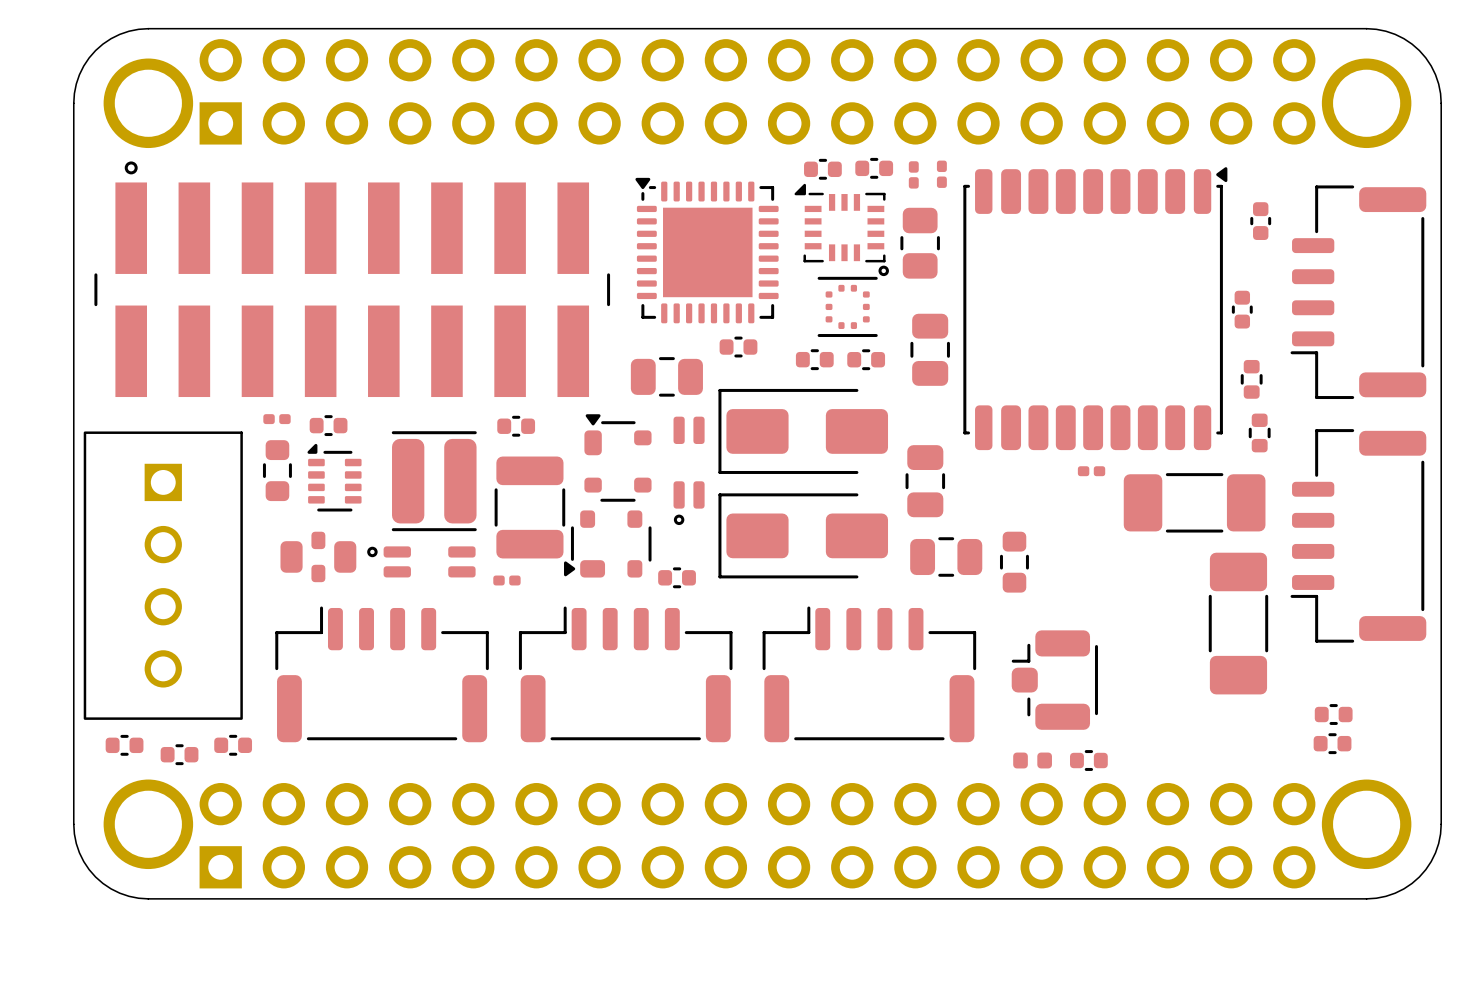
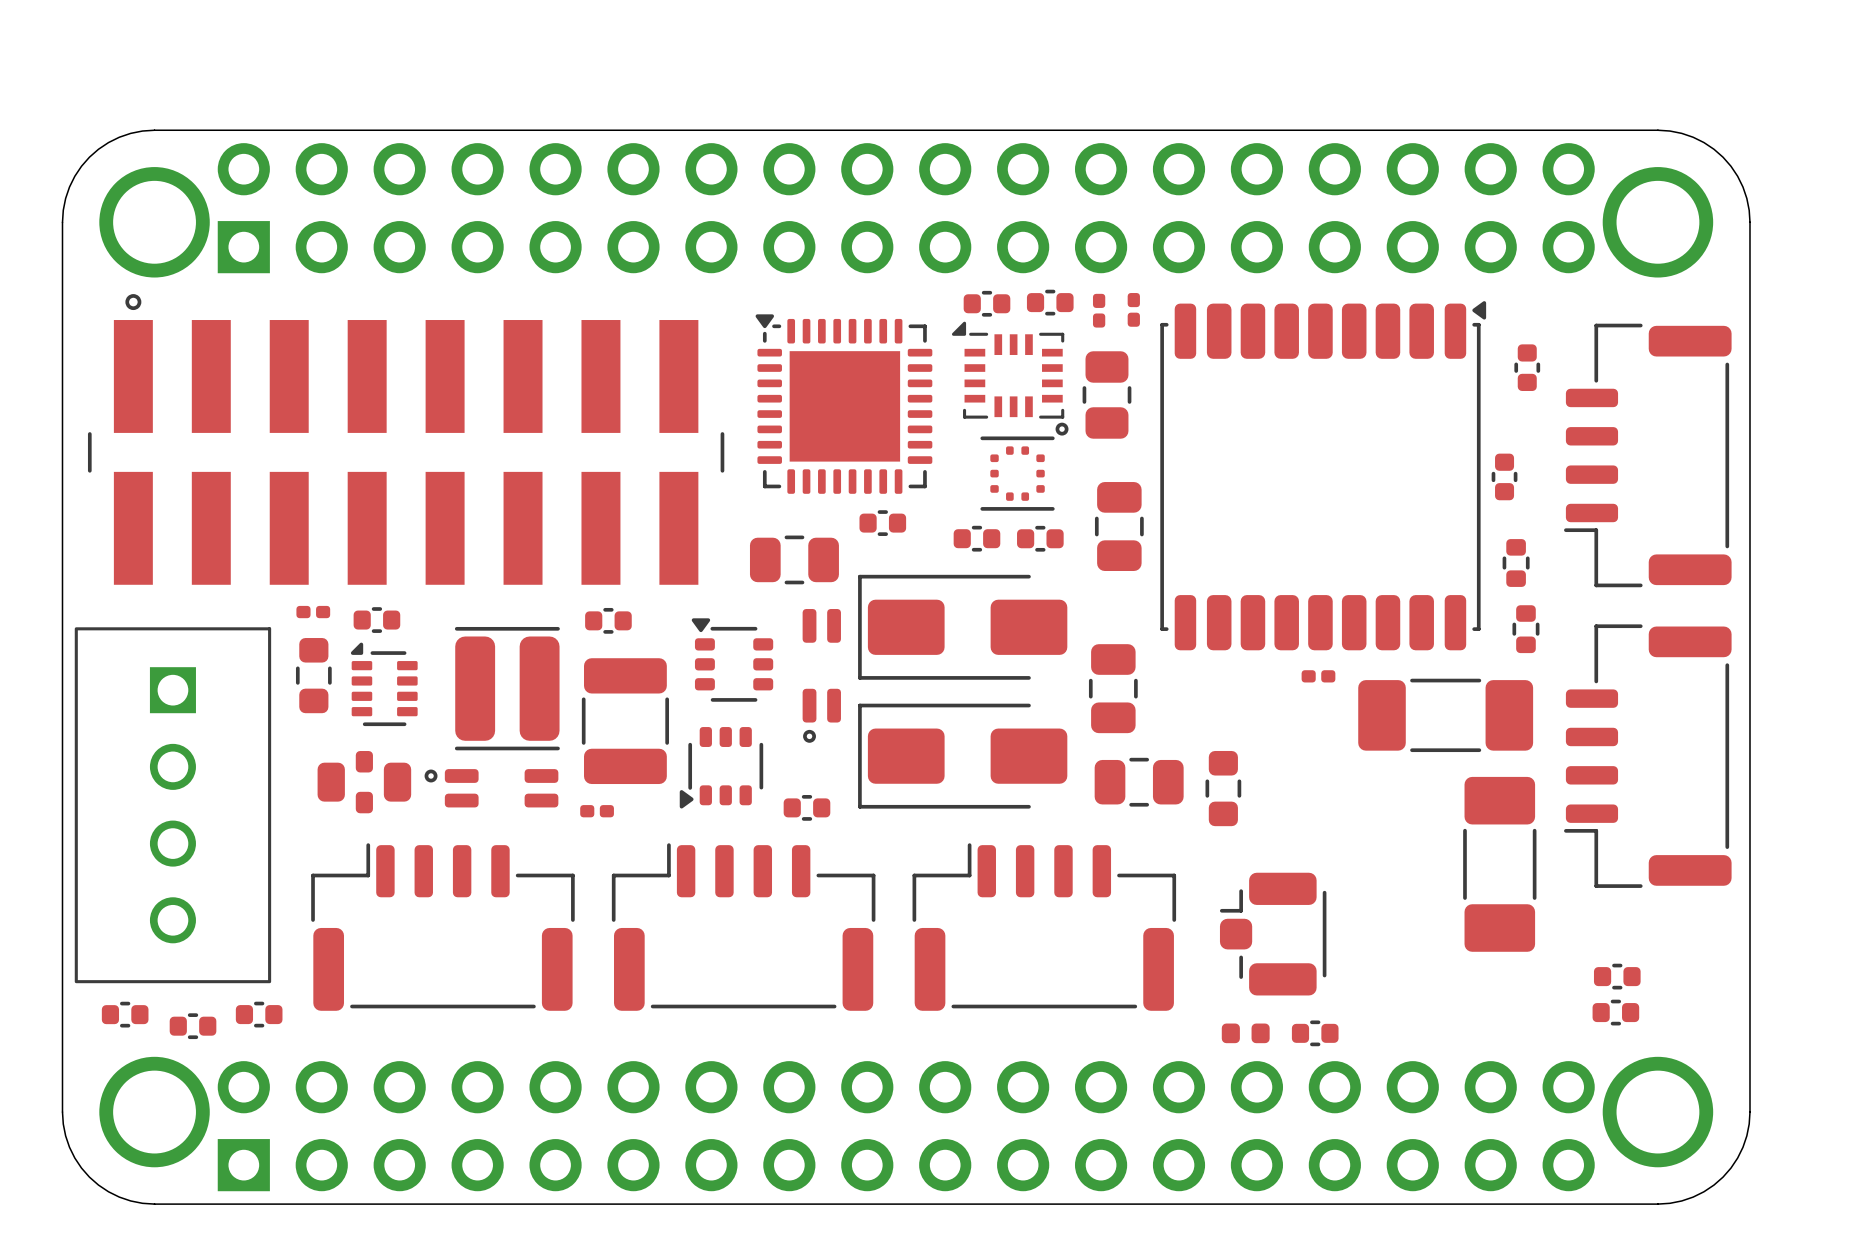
part footprint: [584, 414, 652, 502] -> [691, 618, 774, 702]
part footprint: [564, 510, 652, 578] -> [679, 727, 764, 809]

